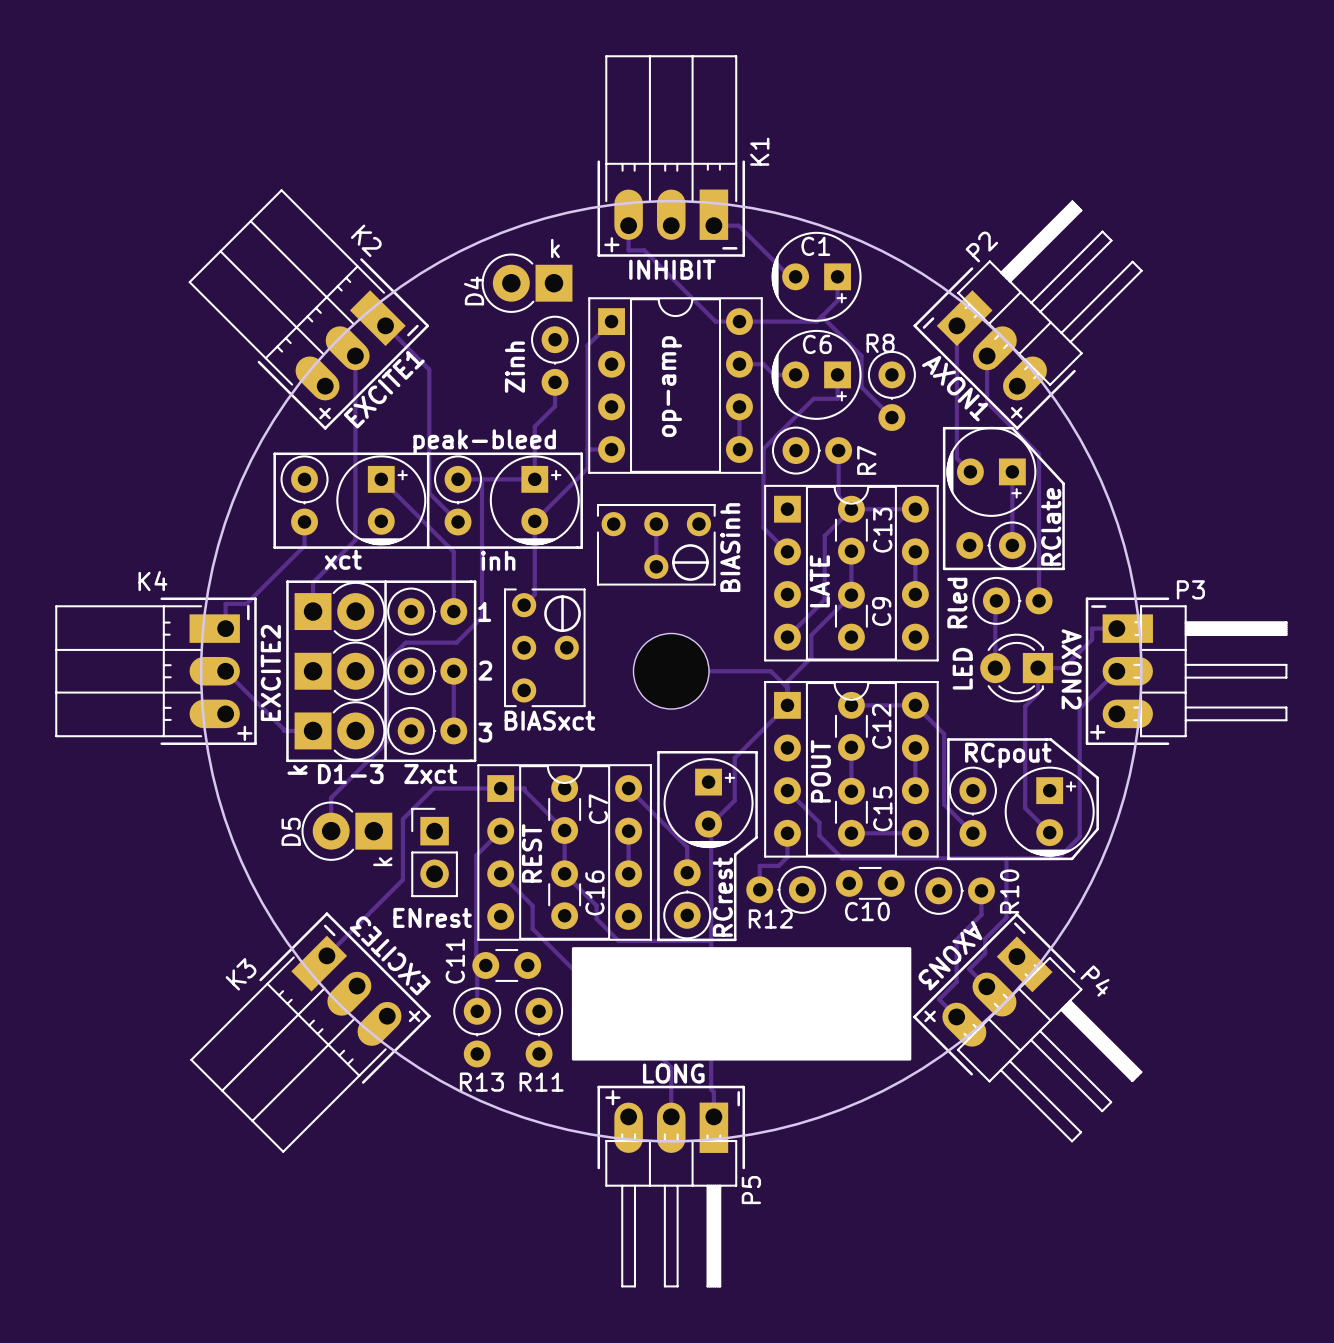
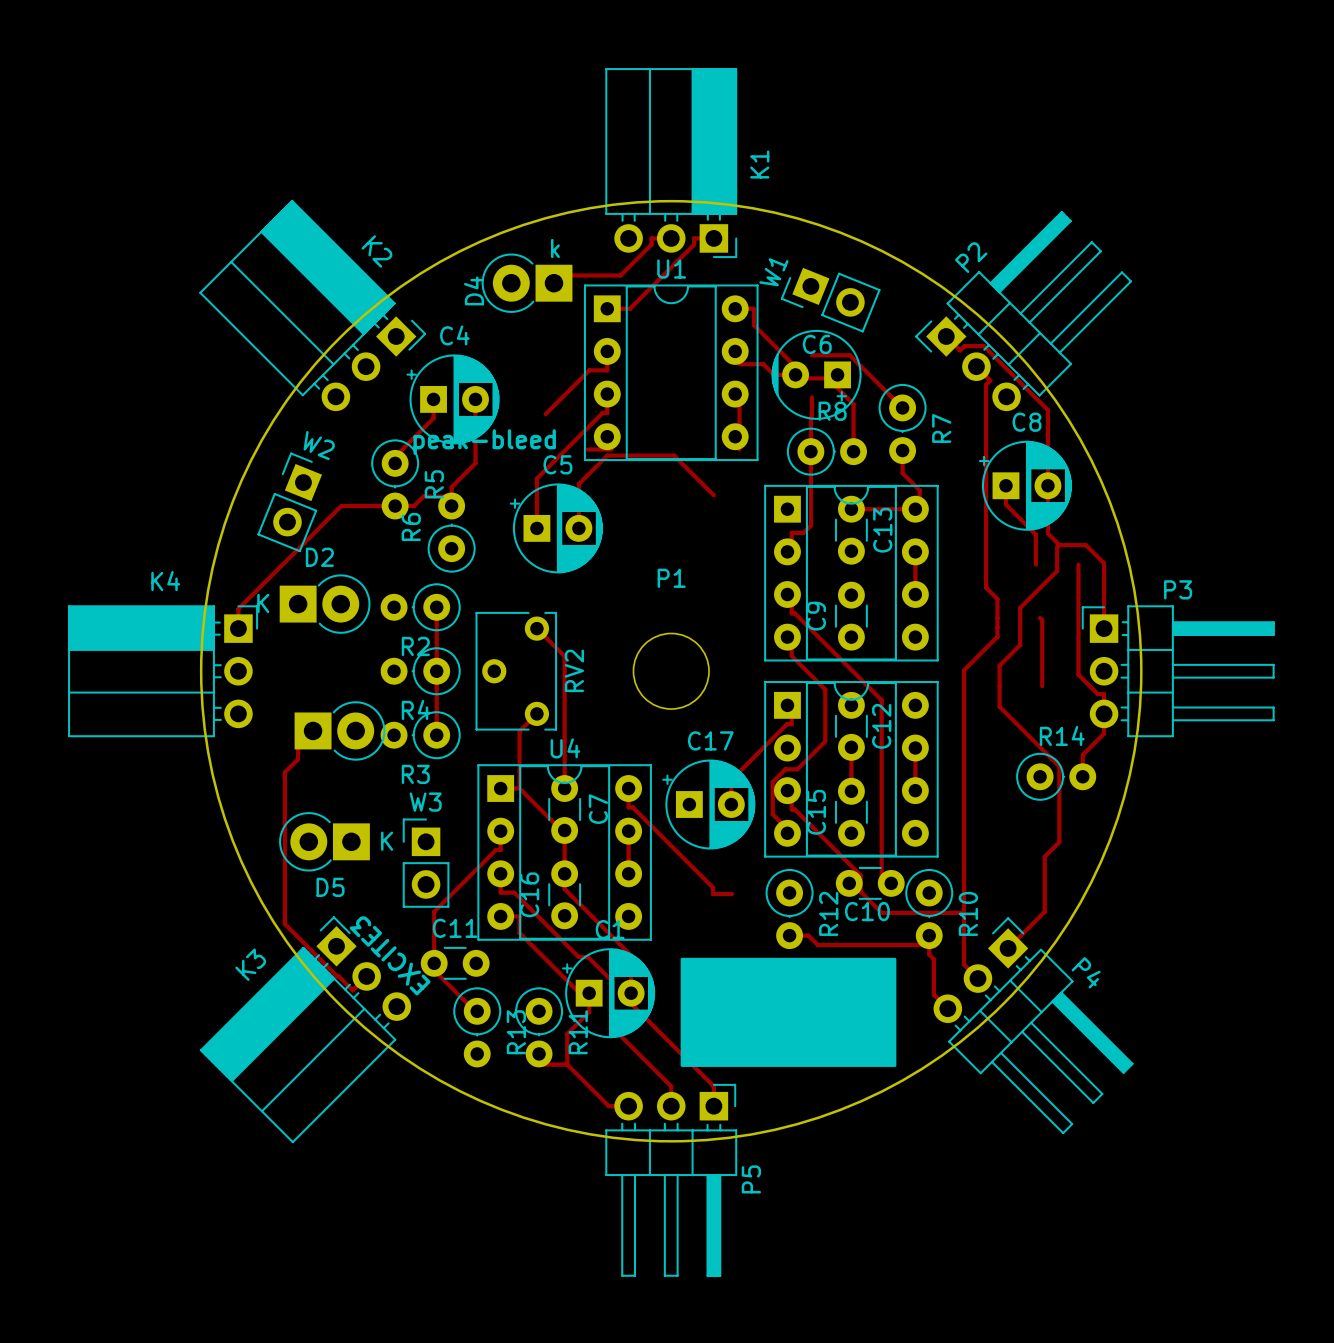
K1 footprint: [597, 55, 746, 257] -> [605, 68, 738, 259]
K2 footprint: [188, 189, 430, 430] -> [199, 199, 427, 412]
P2 footprint: [913, 200, 1143, 430] -> [915, 211, 1133, 412]
track: (628, 225) (628, 250) (644, 250) (715, 321) (816, 321) (837, 300) (837, 276) -> none
track: (713, 225) (738, 225) (789, 276) (795, 276) -> none
C1 footprint: [771, 231, 862, 322] -> [562, 948, 656, 1039]
track: none -> (671, 238) (651, 238) (651, 244) (620, 275) (545, 275)
track: none -> (713, 238) (694, 238) (694, 244) (629, 308) (607, 308)
U1 name: none -> U1 (671, 269)
text: INHIBIT (672, 269) -> none
W1: none -> (830, 300)
track: none -> (735, 308) (754, 308) (754, 325) (807, 378) (827, 378) (853, 404) (853, 451)
track: (821, 316) (861, 355) (861, 387) (891, 417) -> none
track: (611, 321) (587, 345) (587, 468) (534, 521) (534, 594) (524, 605) -> none
track: (385, 325) (429, 369) (429, 493) (458, 522) -> none
track: (956, 325) (956, 458) (970, 471) -> none
track: none -> (946, 336) (960, 350) (964, 346) (983, 346) (1047, 410) (1047, 533) (1059, 545)
track: none -> (607, 351) (607, 370) (589, 370) (545, 414)
part: (555, 355) -> none
track: none -> (811, 355) (849, 355) (902, 407)
track: (355, 356) (355, 540) (313, 582) (313, 611) -> none
track: (987, 356) (987, 402) (1039, 454) (1039, 600) -> none
track: none -> (976, 366) (990, 380) (986, 384) (986, 587) (997, 599) (997, 636) (964, 670) (964, 964) (977, 978)
text: Zinh (514, 367) -> none
track: (837, 374) (837, 398) (813, 398) (763, 448) (763, 527) (787, 551) -> none
track: (555, 382) (555, 406) (534, 426) (534, 479) (458, 479) -> none
U1 position: (675, 385) -> (671, 372)
text: op-amp (671, 386) -> none
text: AXON1 (955, 388) -> none
text: EXCITE1 (384, 389) -> none
R8 rotation: 0° (891, 390) -> 90° counterclockwise (826, 451)
R8 position: (891, 390) -> (826, 451)
track: none -> (607, 394) (607, 412) (602, 412) (536, 478) (536, 528)
track: none -> (811, 397) (810, 525) (803, 532) (791, 532) (791, 551)
track: none -> (433, 399) (433, 418) (395, 456) (395, 463)
C4: none -> (452, 399)
track: none -> (475, 399) (475, 463) (451, 487) (451, 506)
line: (944, 428) (1012, 428) (1063, 483) (1063, 568) (944, 568) (944, 428) -> none
R7 rotation: 0° (812, 450) -> 90° clockwise (902, 423)
R7 position: (812, 450) -> (902, 423)
track: (838, 450) (838, 496) (851, 509) (824, 535) (824, 599) (787, 637) -> none
track: none -> (902, 450) (902, 473) (919, 490) (919, 509)
line: (274, 453) (274, 547) (581, 547) (581, 453) (274, 453) -> none
line: (428, 453) (428, 547) -> none
part: (991, 471) -> none
track: (1012, 471) (1012, 545) -> none
track: (381, 479) (453, 551) (453, 611) -> none
R5: none -> (395, 479)
track: (482, 479) (482, 617) (456, 642) (405, 642) (386, 661) (386, 742) (331, 797) (331, 831) -> none
track: none -> (1005, 485) (1005, 504) (1035, 534) (1035, 564)
C8: none -> (1025, 485)
part: (304, 495) -> none
part: (458, 495) -> none
track: none -> (713, 495) (674, 455) (607, 455) (578, 484) (578, 528)
track: none -> (451, 496) (423, 496) (414, 506) (341, 506) (238, 608) (238, 628)
part: (381, 500) -> none
part: (534, 500) -> none
W2: none -> (289, 502)
track: (304, 522) (304, 545) (246, 603) (225, 603) (225, 628) -> none
track: (656, 524) (656, 566) -> none
text: RClate (1051, 526) -> none
C5: none -> (556, 528)
R6: none -> (451, 532)
part: (656, 544) -> none
part: (996, 545) -> none
track: none -> (1059, 545) (1057, 547) (1057, 570) (1020, 607) (1020, 645) (999, 665) (999, 706) (1059, 766) (1059, 842) (1044, 856) (1044, 911) (1008, 948)
track: none -> (1059, 545) (1085, 545) (1104, 563) (1104, 628)
text: BIASinh (730, 547) -> none
track: (851, 551) (851, 595) (811, 635) (811, 657) (787, 681) (787, 705) (734, 758) (734, 800) (711, 824) -> none
D2 name: none -> D2 (319, 557)
text: xct (343, 559) -> none
text: inh (498, 560) -> none
track: none -> (1078, 564) (1078, 674) (1097, 694) (1104, 694) (1104, 733) (1082, 754) (1082, 776)
P1 name: none -> P1 (671, 578)
line: (287, 581) (475, 581) (475, 760) (287, 760) (287, 581) -> none
line: (385, 581) (385, 760) -> none
text: LATE (819, 581) -> none
track: none -> (791, 594) (791, 613) (794, 613) (881, 700) (881, 885)
K4 footprint: [55, 597, 257, 746] -> [68, 605, 259, 738]
P3 footprint: [1085, 597, 1288, 746] -> [1081, 605, 1275, 738]
track: (996, 600) (995, 668) -> none
part: (1012, 600) -> none
D2 text: none -> K (263, 603)
text: Rled (957, 603) -> none
R2: none -> (420, 607)
track: none -> (436, 607) (436, 735)
D2 position: (340, 611) -> (325, 604)
part: (427, 611) -> none
text: 1 (484, 611) -> none
C9 name position: C9 (881, 611) -> C9 (816, 616)
track: none -> (1040, 617) (1042, 620) (1042, 686)
track: none -> (536, 628) (564, 656) (564, 788)
track: (1116, 628) (1092, 628) (1092, 639) (1063, 668) (1037, 668) (1037, 693) (1025, 706) (1025, 808) (1049, 832) -> none
track: none -> (791, 637) (791, 656) (825, 689) (825, 741) (797, 769) (785, 769) (772, 782) (772, 814) (791, 833)
part: (544, 647) -> none
text: LED (962, 668) -> none
part: (1016, 668) -> none
text: AXON2 (1071, 669) -> none
text: 2 (485, 670) -> none
track: (225, 671) (284, 730) (313, 730) -> none
part: (340, 671) -> none
R4: none -> (420, 671)
part: (427, 671) -> none
track: (453, 671) (453, 730) -> none
RV2: none -> (516, 671)
track: (671, 671) (770, 671) (787, 687) -> none
track: (1116, 671) (1079, 708) (1079, 836) (1058, 858) (842, 858) (819, 835) (819, 822) (787, 790) -> none
text: EXCITE2 (270, 672) -> none
track: none -> (791, 705) (791, 724) (787, 724) (731, 779) (731, 804)
track: (855, 705) (915, 705) (944, 734) (944, 804) (972, 833) -> none
text: BIASxct (549, 720) -> none
part: (427, 730) -> none
text: 3 (485, 732) -> none
track: none -> (298, 735) (298, 759) (284, 772) (284, 924) (352, 990) (366, 976)
R3: none -> (420, 735)
line: (948, 739) (1050, 739) (1097, 777) (1097, 829) (1072, 858) (948, 858) (948, 739) -> none
U4 name: none -> U4 (565, 748)
line: (658, 752) (658, 939) (735, 939) (735, 854) (756, 837) (756, 752) (658, 752) -> none
text: RCpout (1008, 755) -> none
text: k (297, 769) -> none
text: POUT (820, 771) -> none
text: D1-3 (350, 774) -> none
text: Zxct (430, 774) -> none
R14: none -> (1056, 776)
track: (500, 788) (433, 788) (402, 819) (402, 879) (326, 955) -> none
track: (519, 788) (524, 788) (564, 830) -> (536, 713) (519, 731) (519, 788) (561, 830) (564, 830)
track: (628, 788) (687, 847) (687, 872) -> (628, 788) (628, 807) (632, 807) (713, 887) (713, 894) (732, 894)
track: none -> (791, 790) (791, 809) (794, 809) (860, 875) (860, 891) (881, 912) (964, 912)
W3 name: none -> W3 (425, 802)
part: (708, 803) -> none
C17: none -> (708, 804)
part: (972, 806) -> none
C15 name position: C15 (882, 808) -> C15 (816, 812)
part: (1049, 811) -> none
track: (711, 824) (711, 1089) (713, 1092) -> none
D5 name rotation: 0° (291, 831) -> 90° clockwise (330, 887)
D5 name position: D5 (291, 831) -> D5 (330, 887)
D5 position: (346, 831) -> (324, 841)
track: (500, 831) (476, 855) (476, 955) (485, 965) (477, 974) (477, 1011) -> (500, 831) (500, 850) (495, 850) (434, 911) (434, 970) (472, 1009)
track: (787, 833) (787, 857) (778, 865) (759, 865) (759, 889) -> none
track: (851, 833) (915, 833) -> none
D5 text: none -> K (387, 841)
W3 position: (434, 852) -> (426, 863)
text: REST (532, 853) -> none
track: (1006, 858) (1006, 917) (985, 938) (985, 953) (969, 969) (986, 986) -> none
D5 text: k (382, 861) -> none
track: (500, 873) (532, 905) (532, 928) (671, 1067) (671, 1086) -> (500, 873) (500, 892) (514, 892) (578, 957) (588, 957) (612, 981) (612, 1027) (671, 1086)
track: (564, 873) (596, 905) (596, 918) (618, 940) (711, 940) -> (564, 873) (564, 889) (631, 955) (631, 1003) (713, 1086) (713, 1092)
R12 rotation: 0° (786, 889) -> 90° counterclockwise (789, 909)
R10 rotation: 0° (954, 890) -> 90° clockwise (929, 909)
track: (981, 890) (981, 914) (956, 939) (956, 981) (939, 999) (956, 1016) -> none
C16 name position: C16 (594, 892) -> C16 (529, 894)
text: RCrest (722, 897) -> none
part: (687, 899) -> none
K3 footprint: [190, 912, 431, 1153] -> [199, 916, 412, 1144]
P4 footprint: [913, 913, 1143, 1143] -> [933, 917, 1134, 1135]
track: none -> (500, 916) (519, 916) (519, 933) (589, 1002)
text: ENrest (432, 917) -> none
track: none -> (789, 935) (808, 935) (817, 945) (929, 945)
track: none -> (929, 935) (929, 954) (933, 959) (933, 994) (947, 1008)
drawing: [571, 947, 912, 1061] -> none
text: AXON3 (950, 955) -> none
drawing: none -> [680, 957, 897, 1067]
C11 name rotation: 0° (455, 961) -> 90° clockwise (455, 928)
C11 position: (506, 965) -> (455, 963)
track: none -> (589, 993) (589, 1012) (567, 1033) (567, 1064)
track: none -> (534, 1064) (567, 1064)
track: none -> (567, 1064) (608, 1106) (628, 1106)
text: LONG (673, 1073) -> none
R13 name rotation: 0° (481, 1082) -> 90° counterclockwise (516, 1032)
R13 name position: R13 (481, 1082) -> R13 (516, 1032)
R11 name rotation: 0° (541, 1082) -> 90° counterclockwise (578, 1032)
R11 name position: R11 (541, 1082) -> R11 (578, 1032)
P5 footprint: [597, 1085, 746, 1288] -> [605, 1083, 738, 1277]

